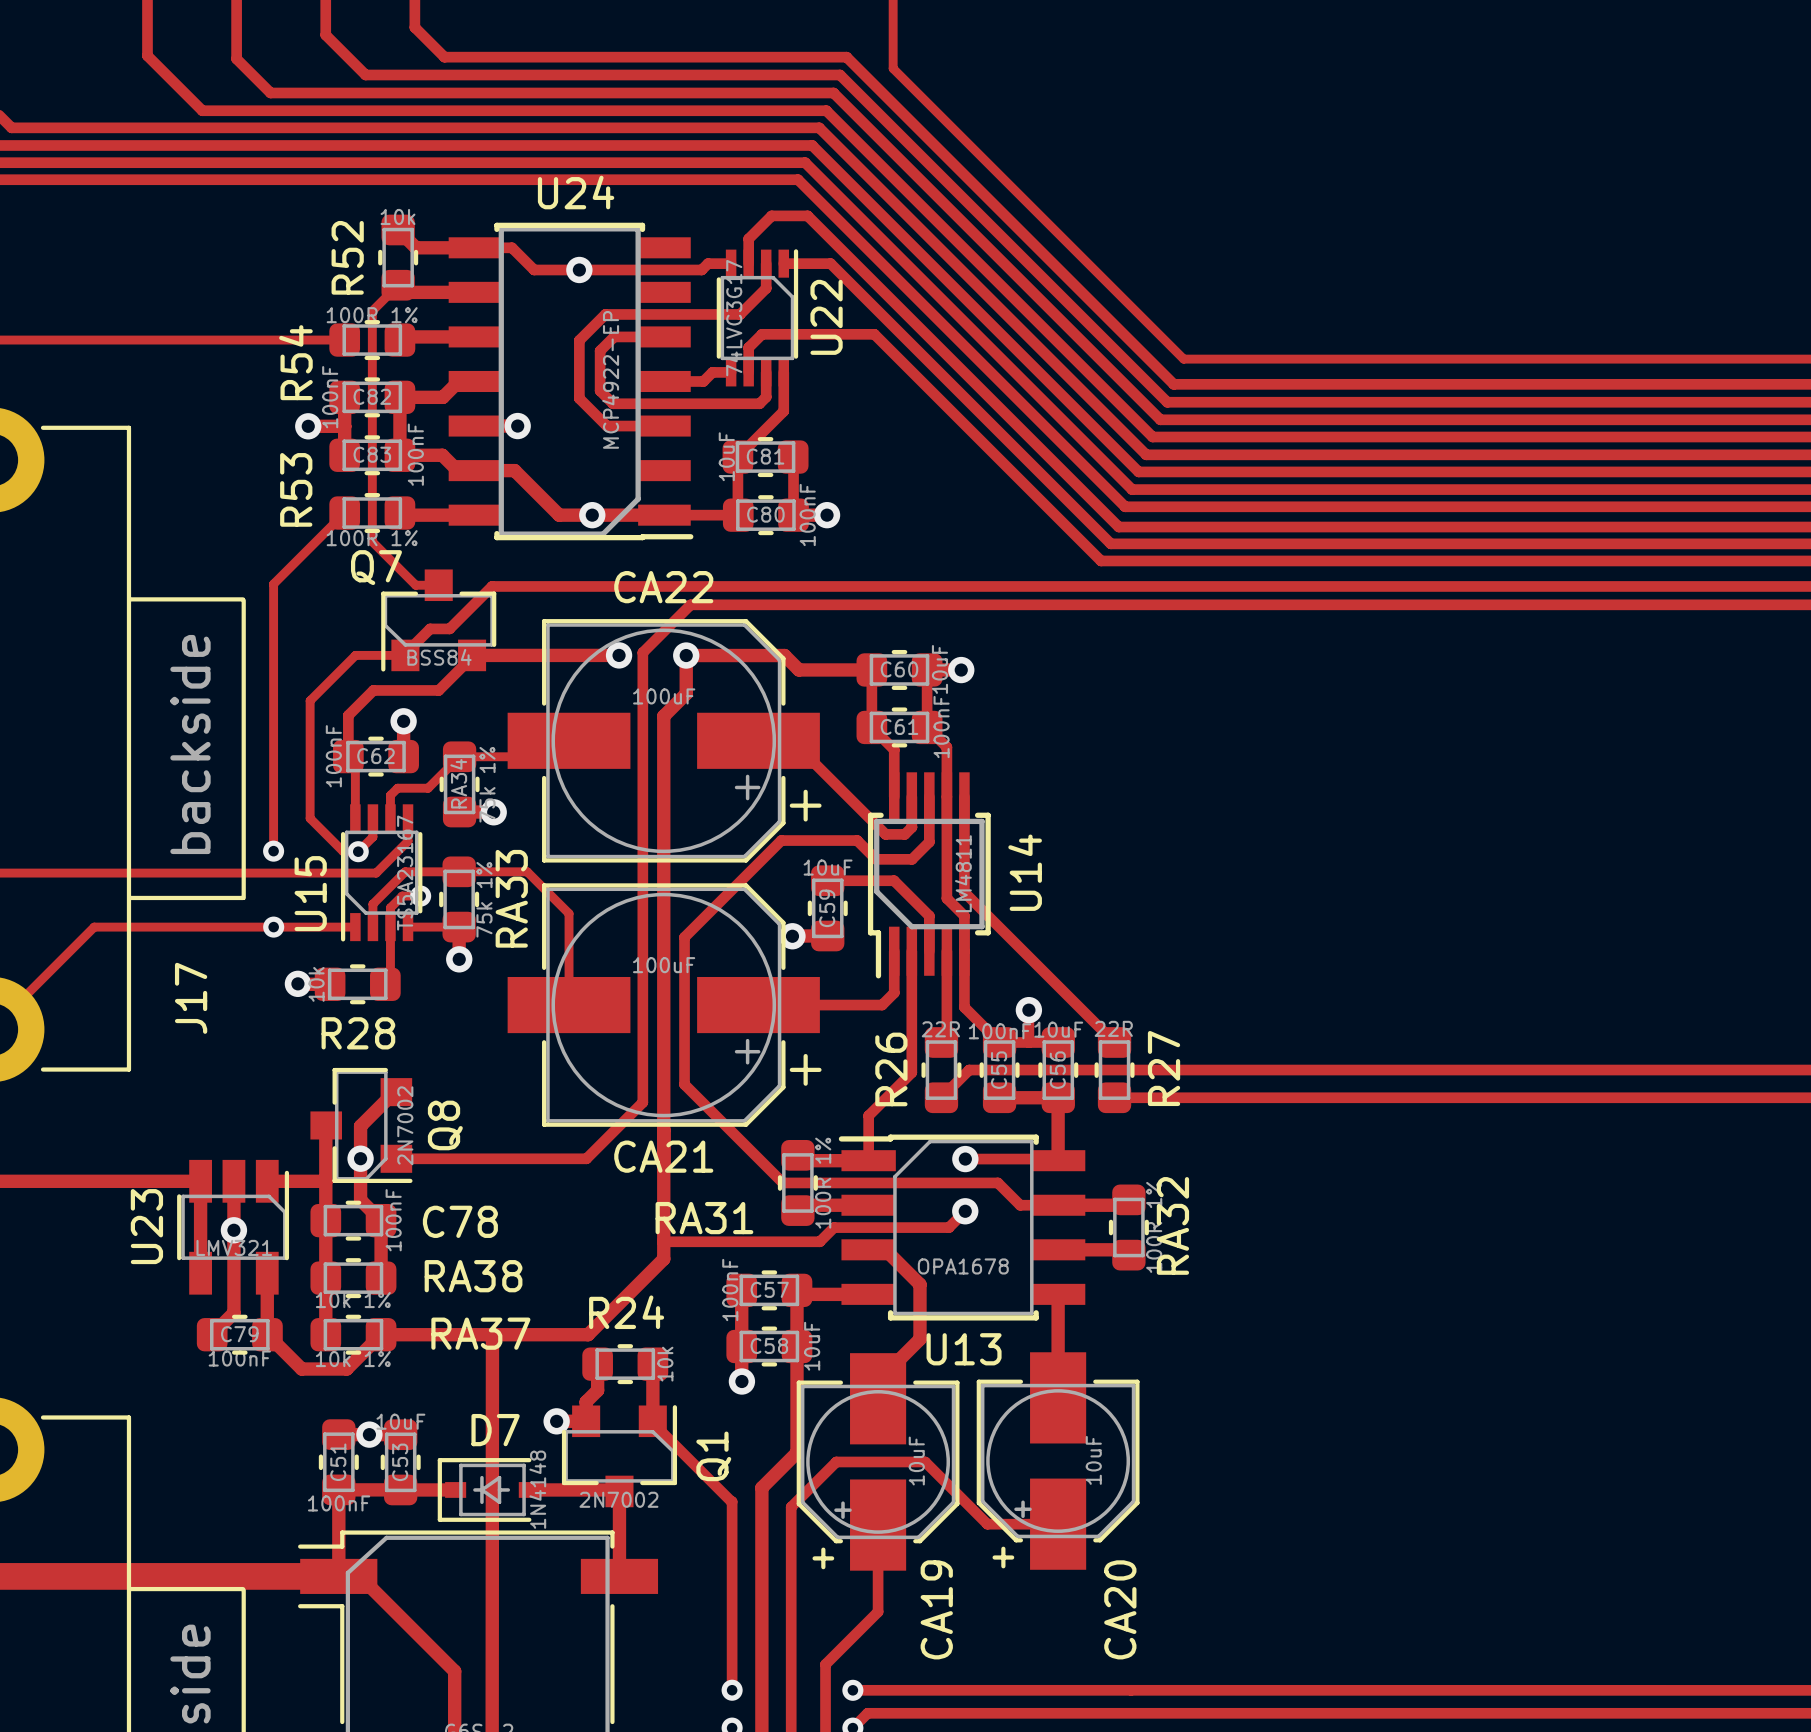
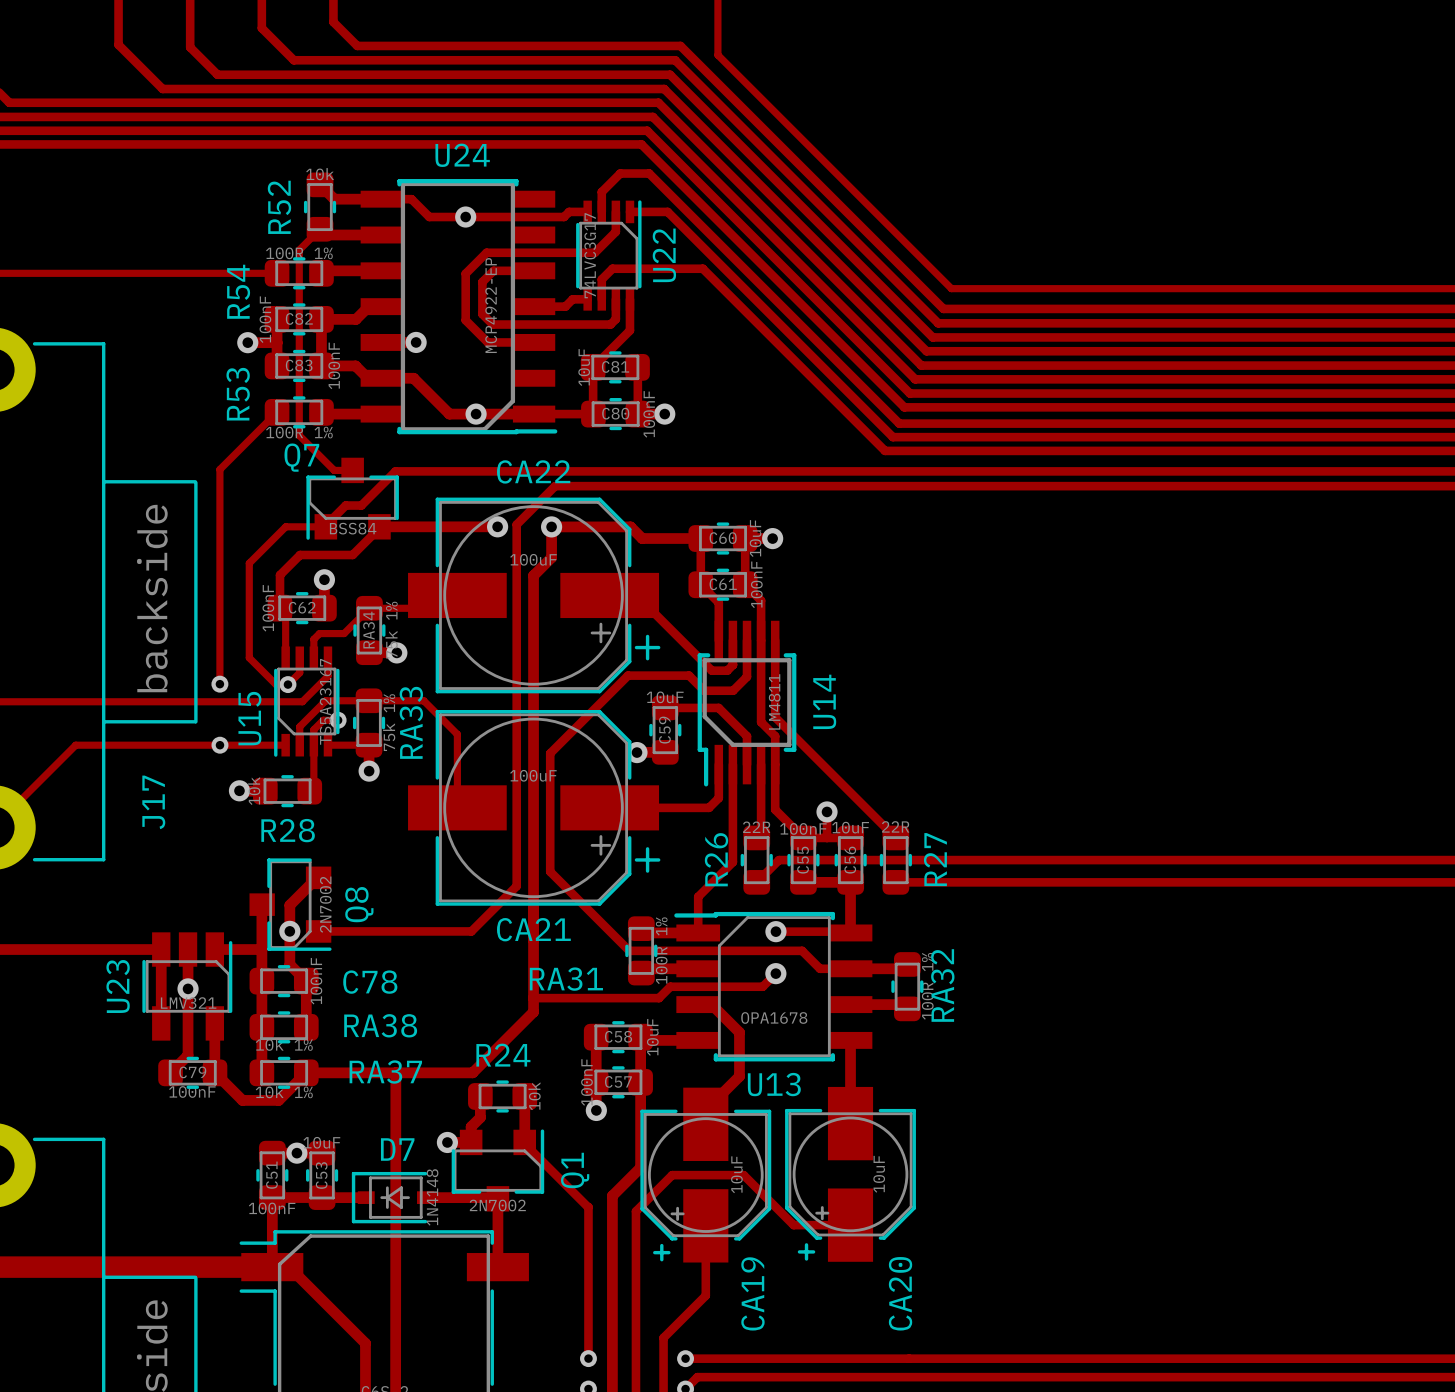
C57 name: C57 (769, 1289) -> C58 (618, 1036)
C57 value: 100nF (730, 1290) -> 10uF (652, 1037)
C58 name: C58 (769, 1345) -> C57 (618, 1081)
C58 value: 10uF (812, 1346) -> 100nF (586, 1082)

